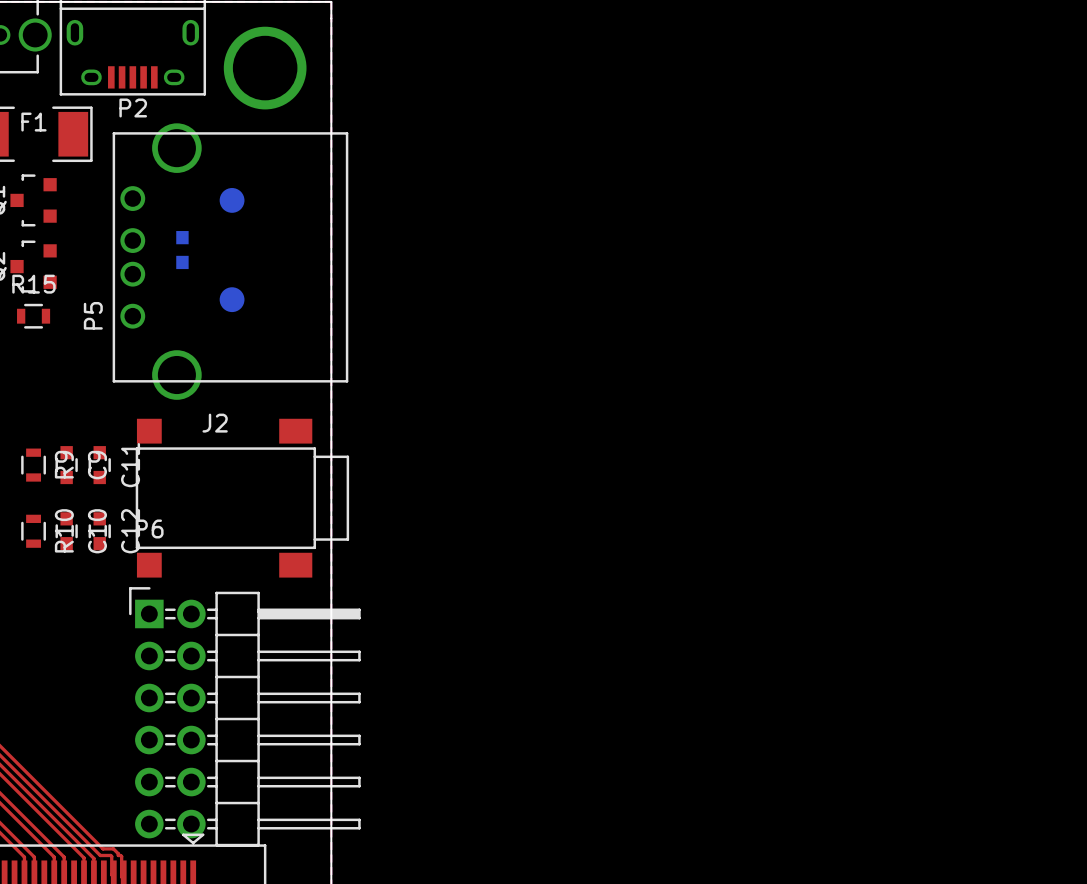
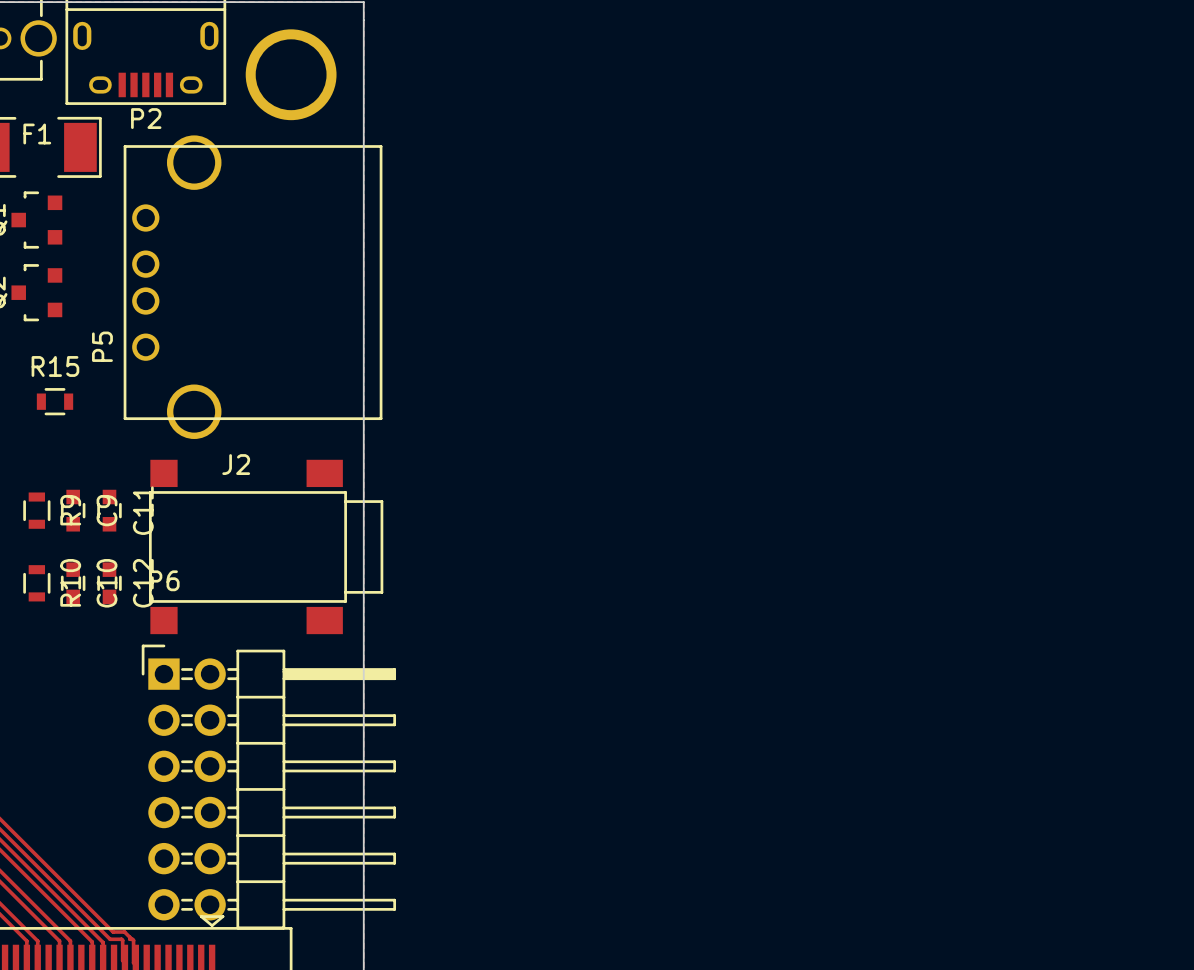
part: (232, 200) -> none
part: (182, 250) -> none
part: (232, 299) -> none
R15 position: (33, 316) -> (55, 401)

